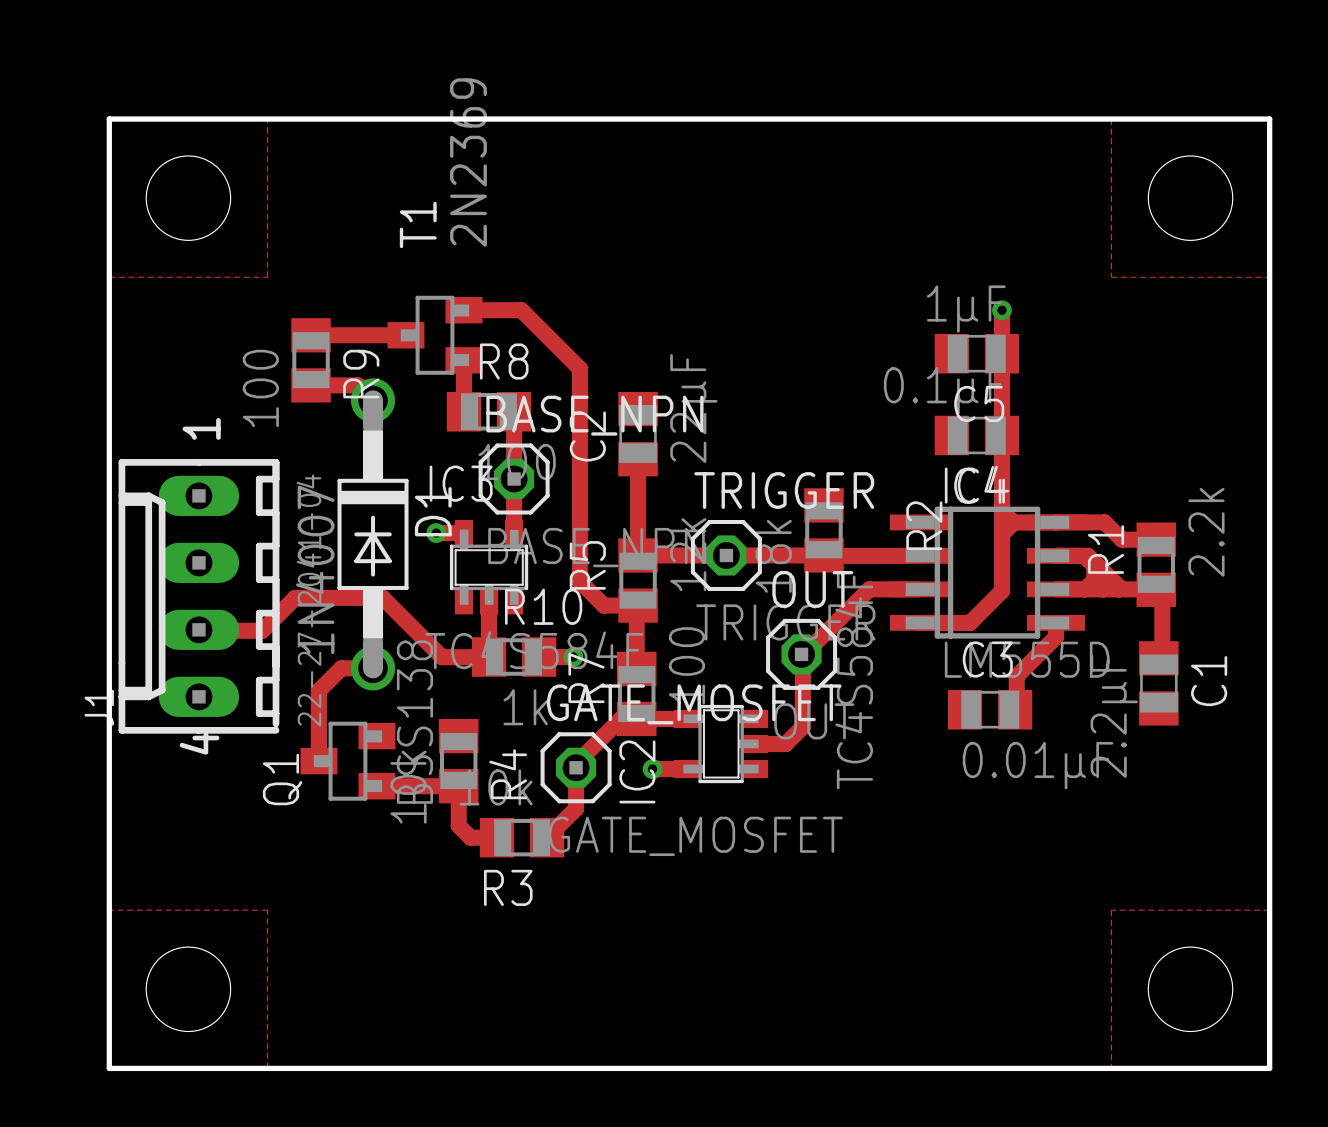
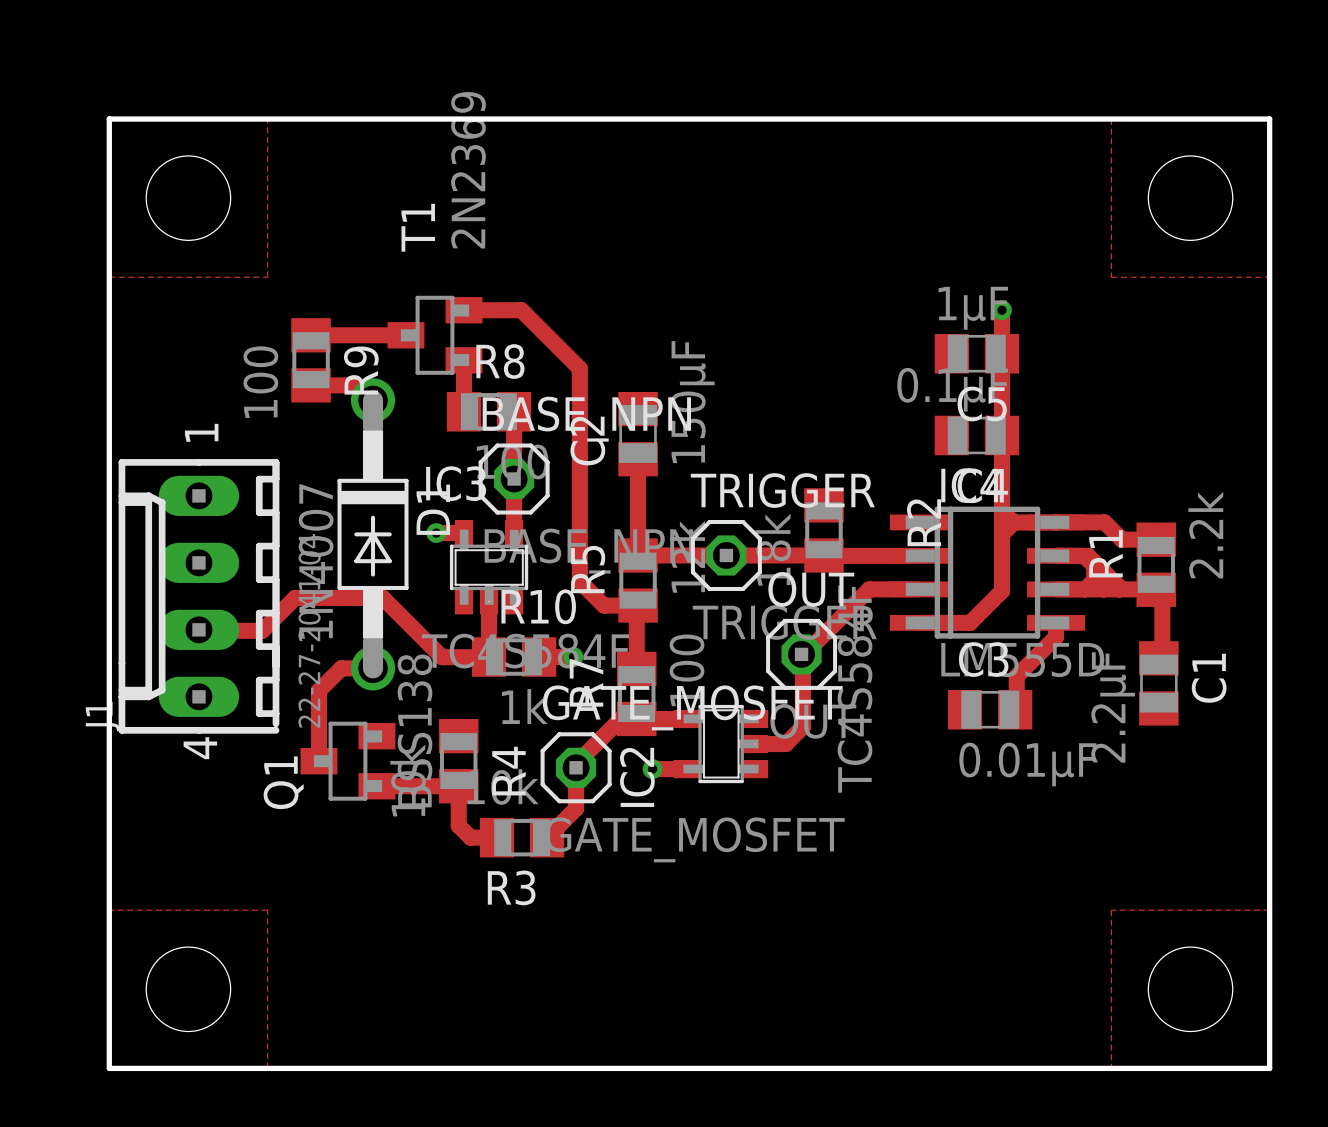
C2 value: 22µF (693, 408) -> 150µF (692, 402)

